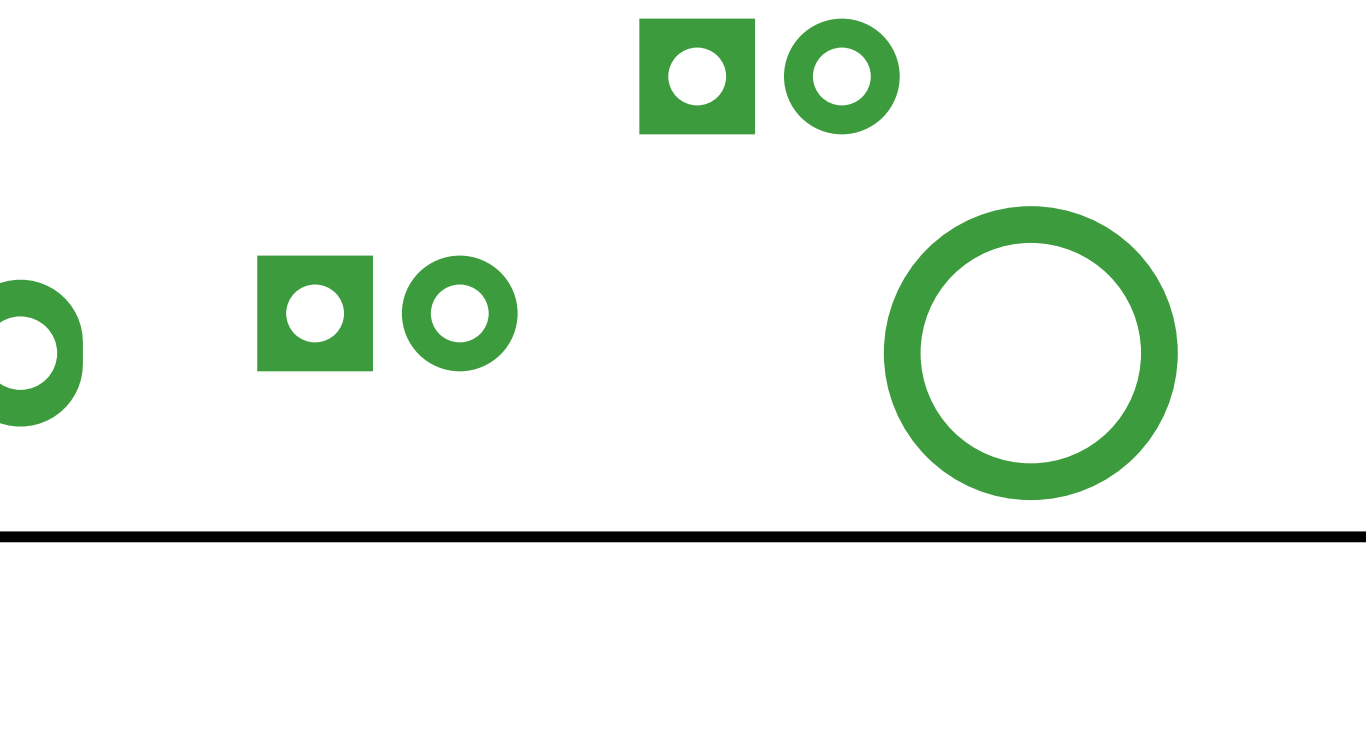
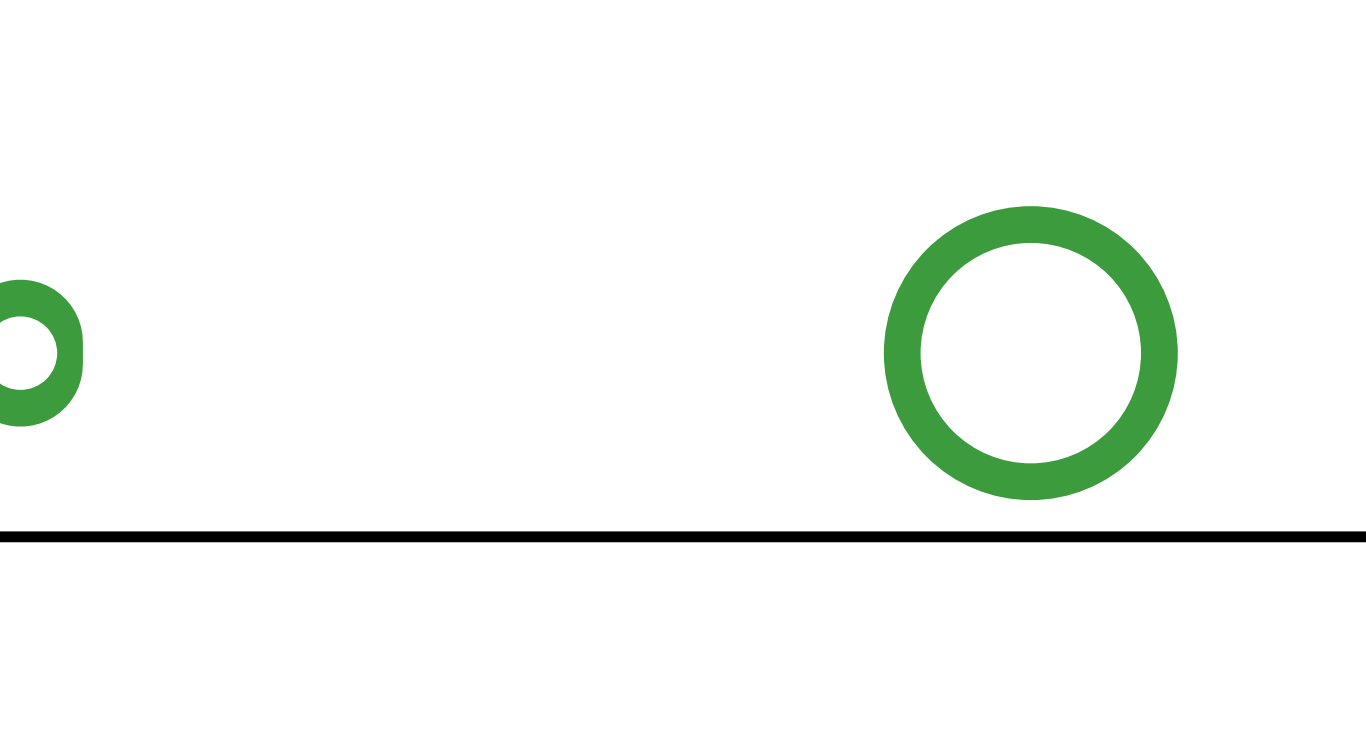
part: (769, 76) -> none
part: (387, 313) -> none

